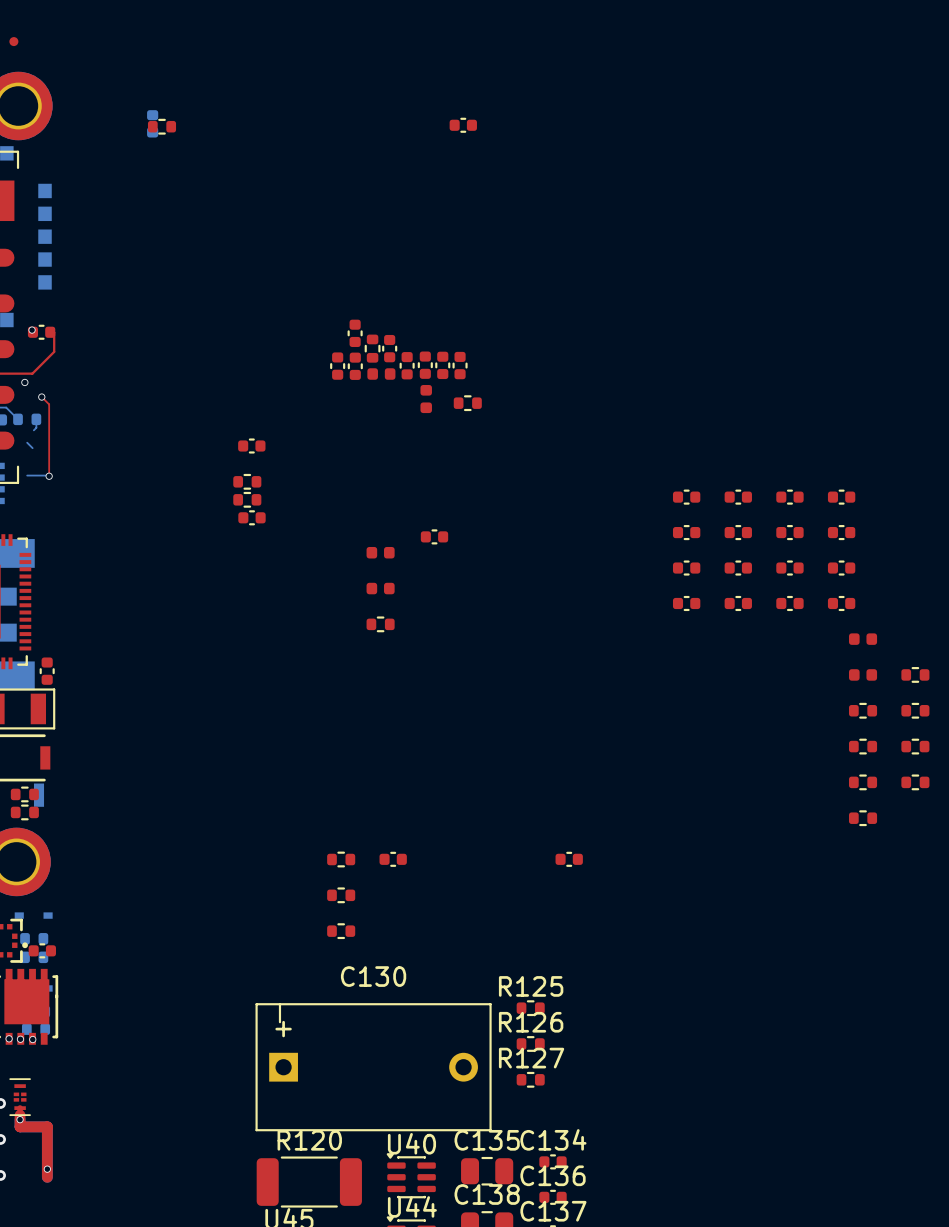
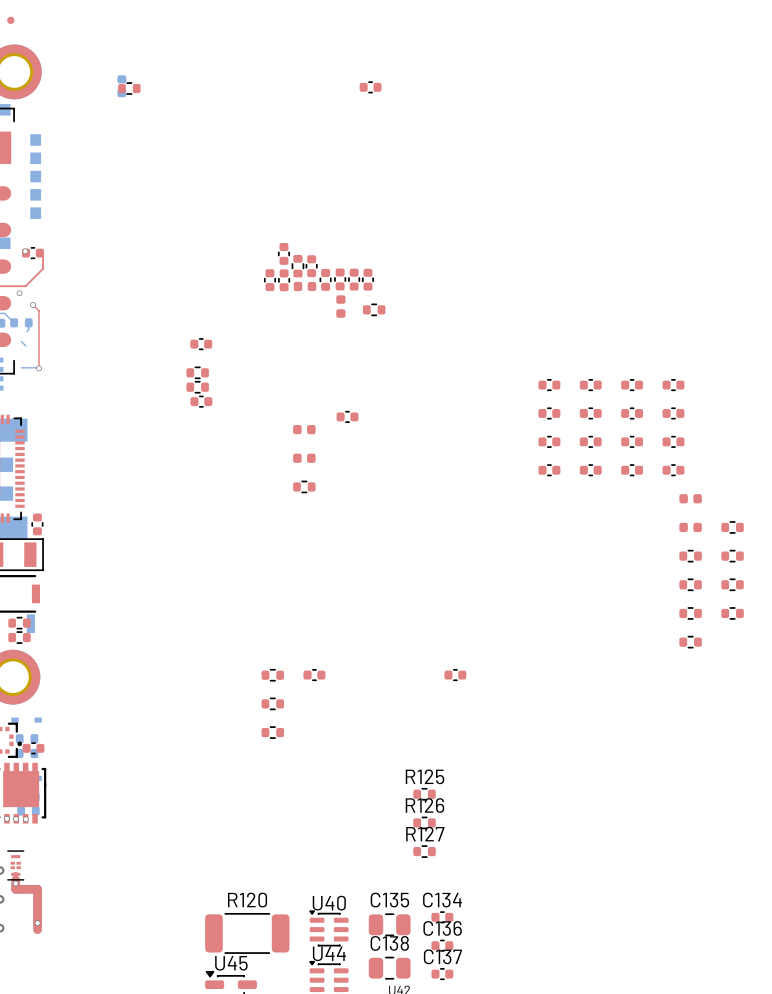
C130: (373, 1067) -> none

